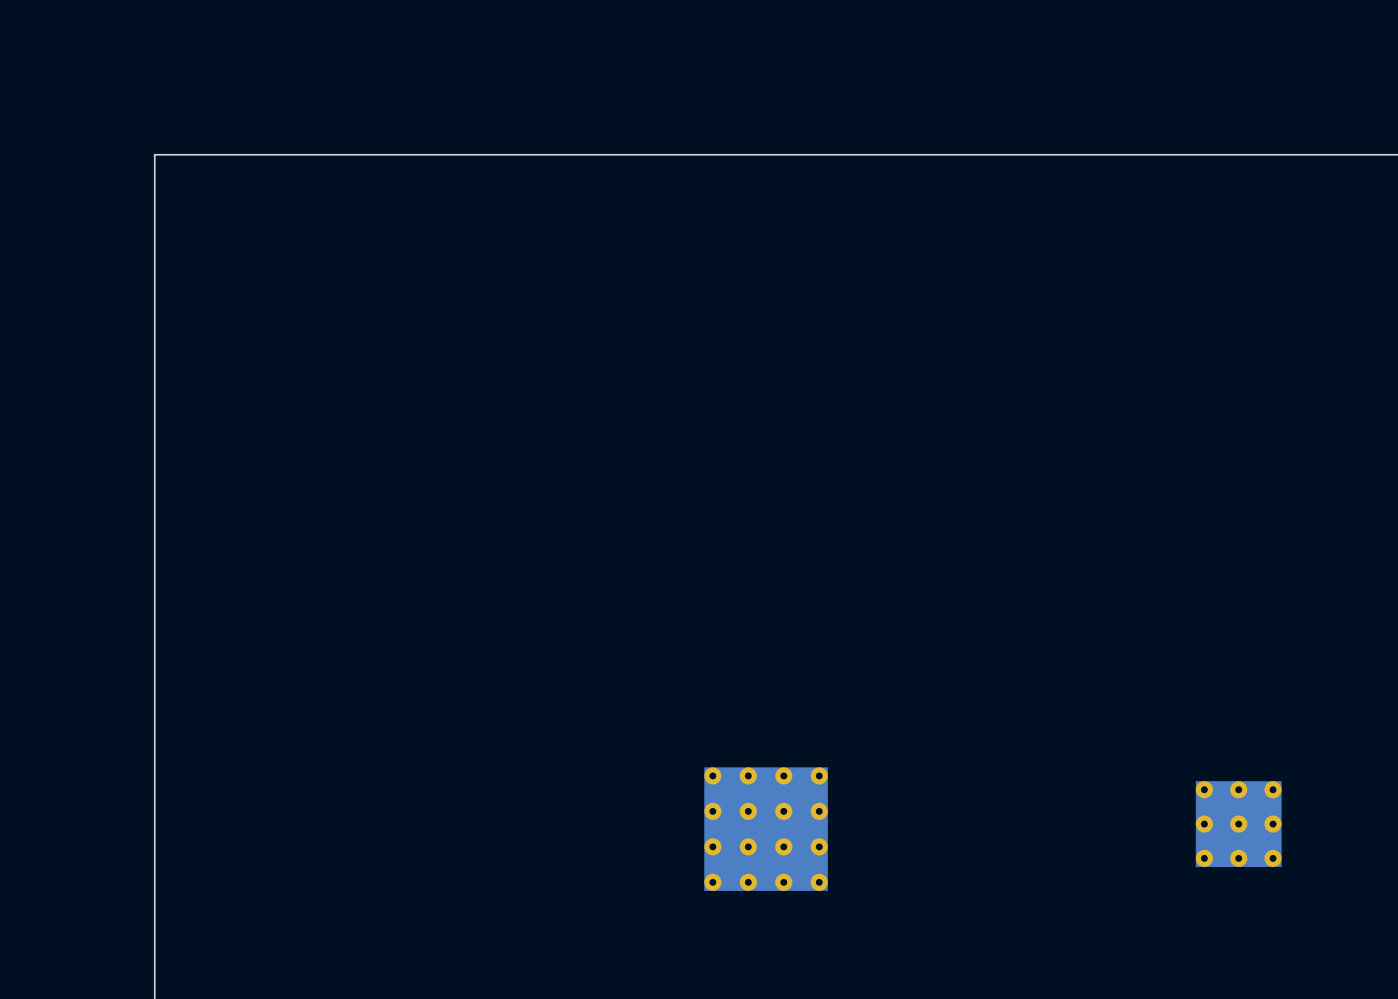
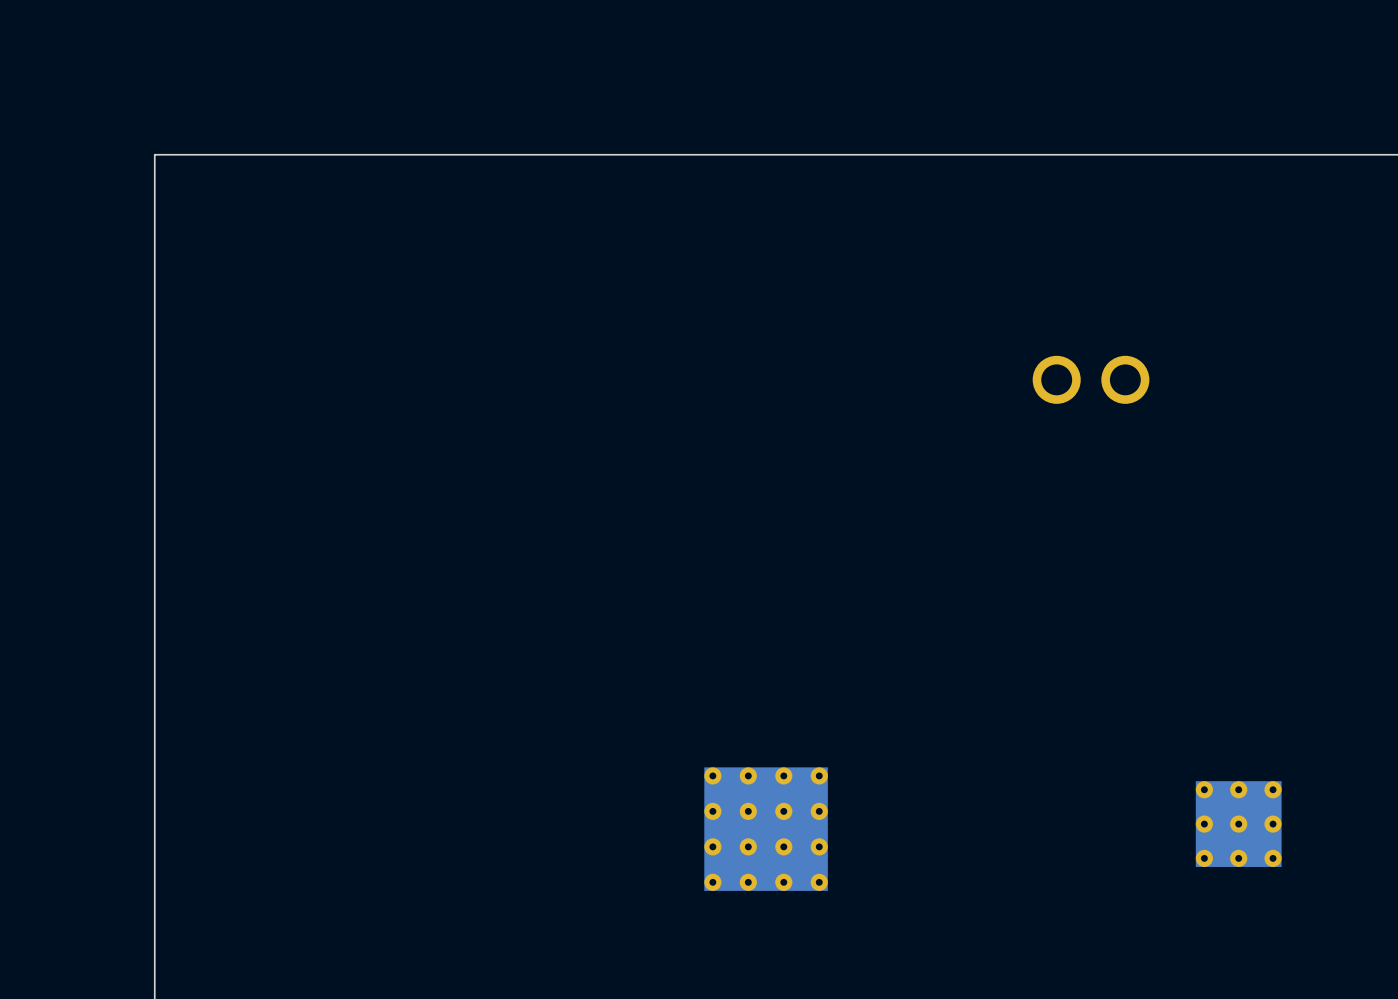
part: none -> (1091, 379)

